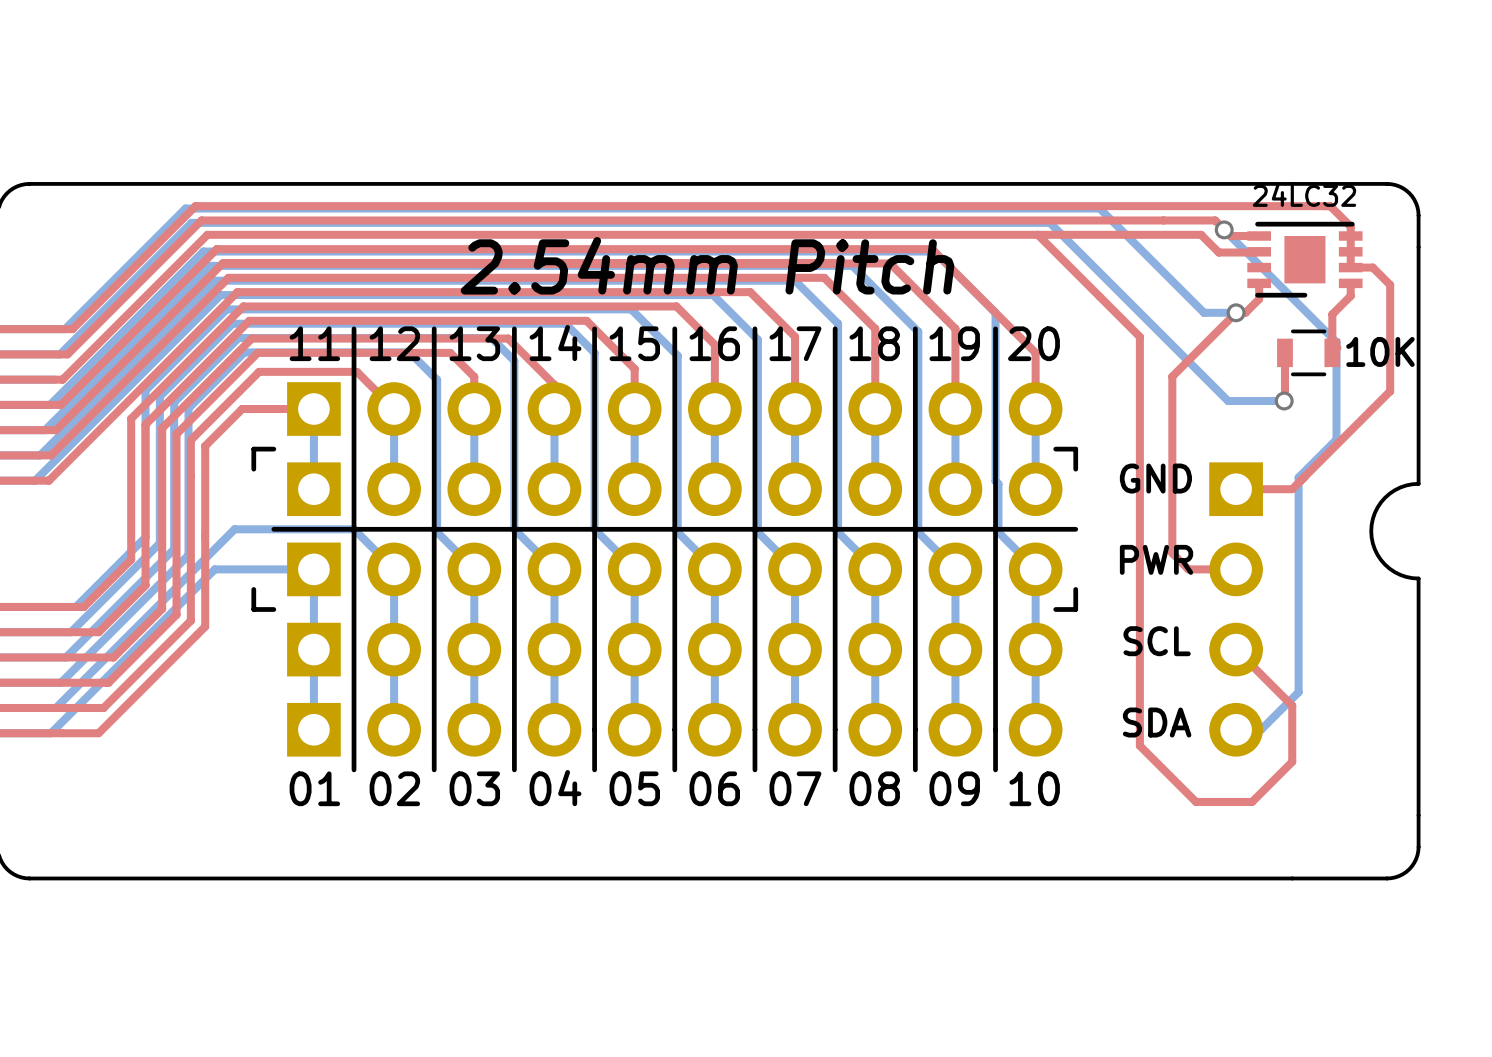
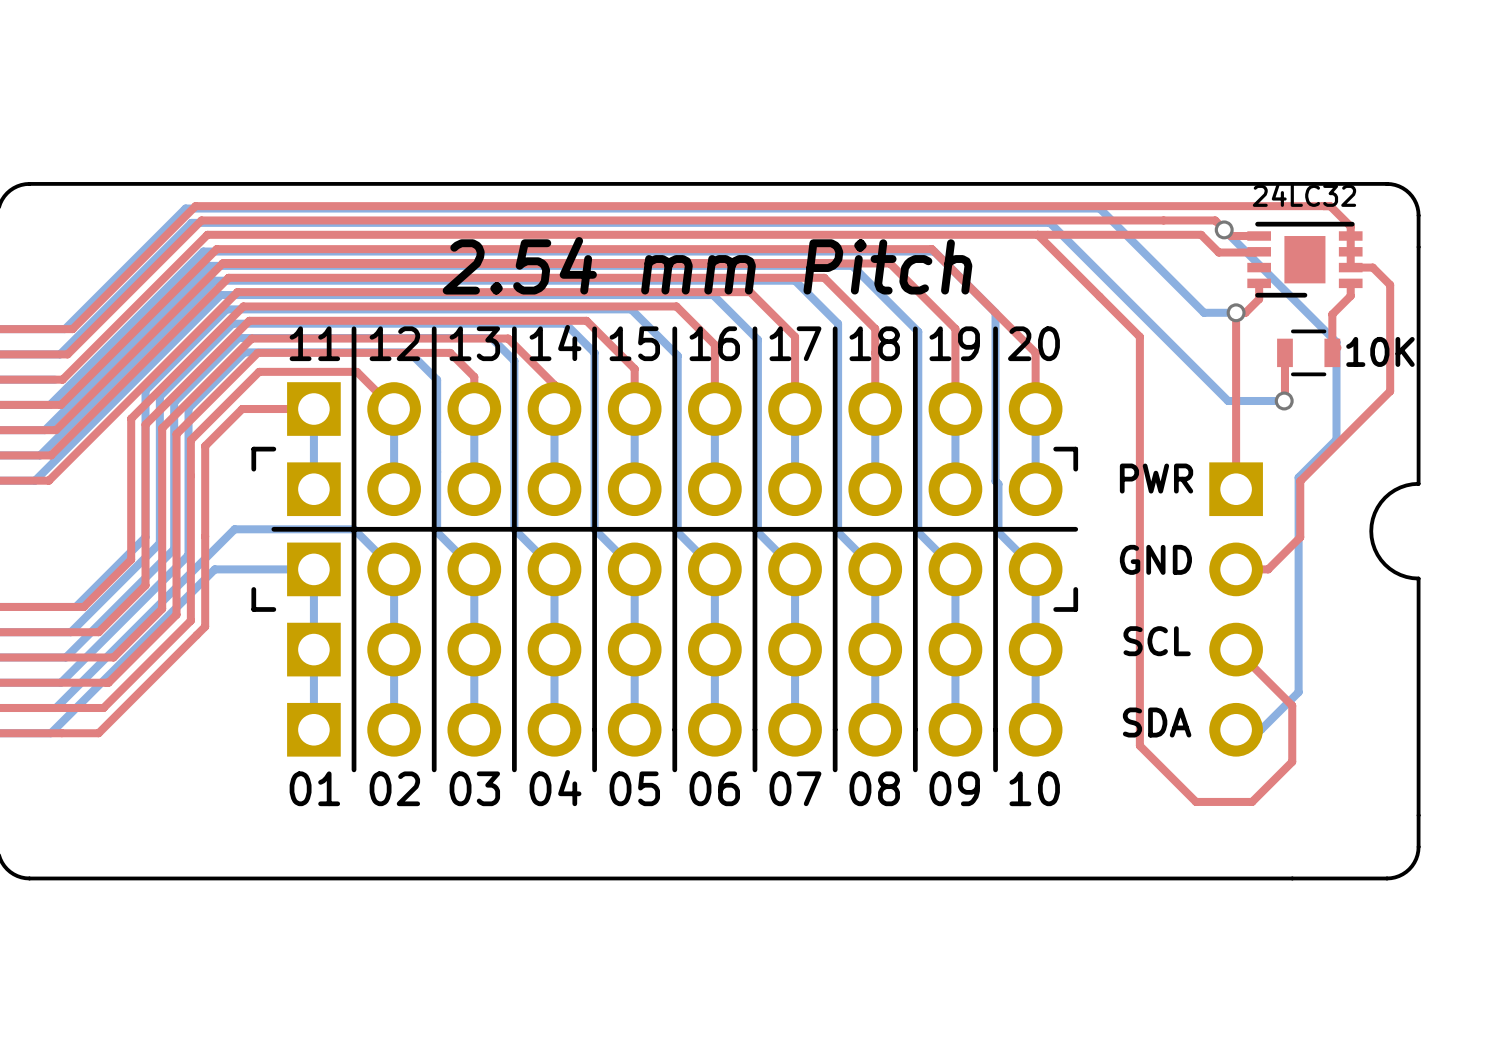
text: 2.54mm Pitch (707, 265) -> 2.54 mm Pitch (707, 265)
top track: (1236, 312) (1172, 376) (1172, 553) (1188, 569) (1236, 569) -> (1236, 312) (1236, 489)
text: GND (1155, 478) -> PWR (1156, 478)
top track: (1300, 481) (1292, 489) (1236, 489) -> (1300, 481) (1300, 537) (1268, 569) (1236, 569)
text: PWR (1156, 559) -> GND (1155, 559)

